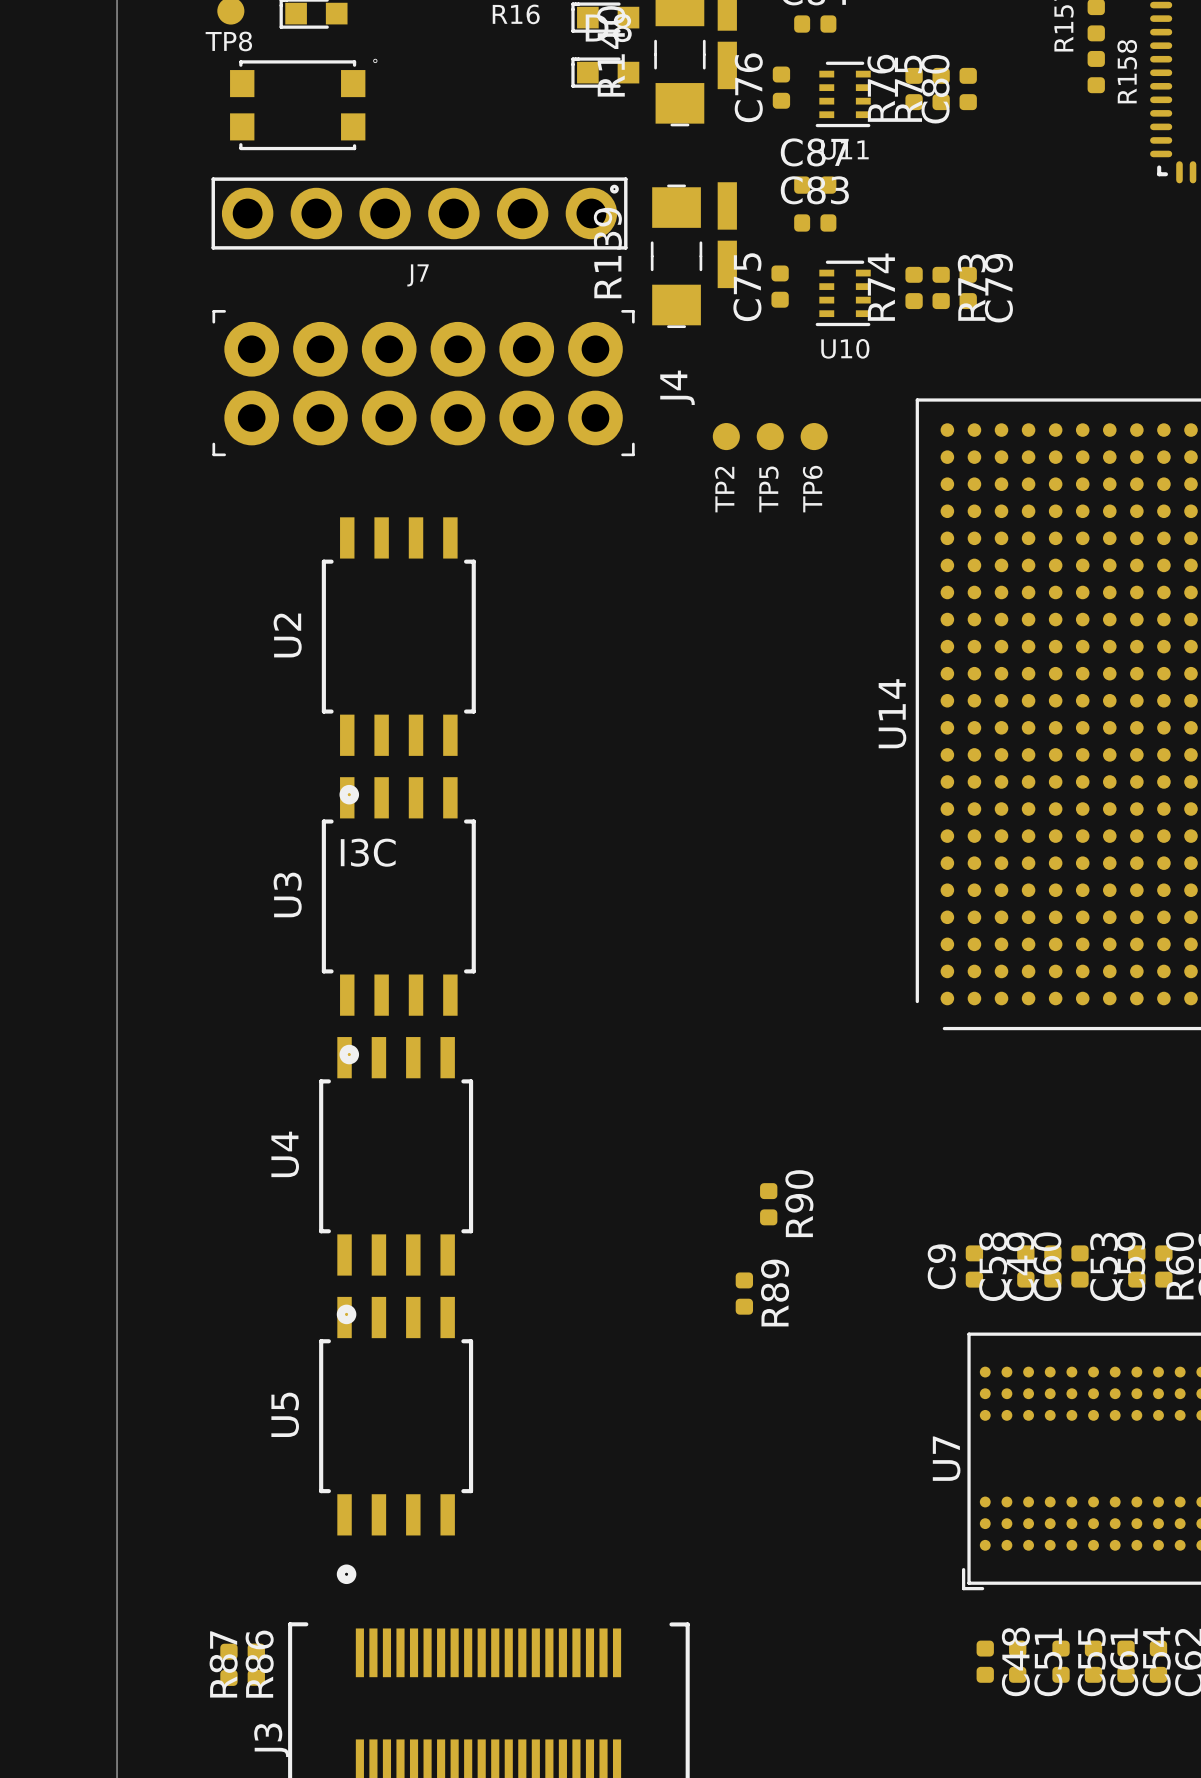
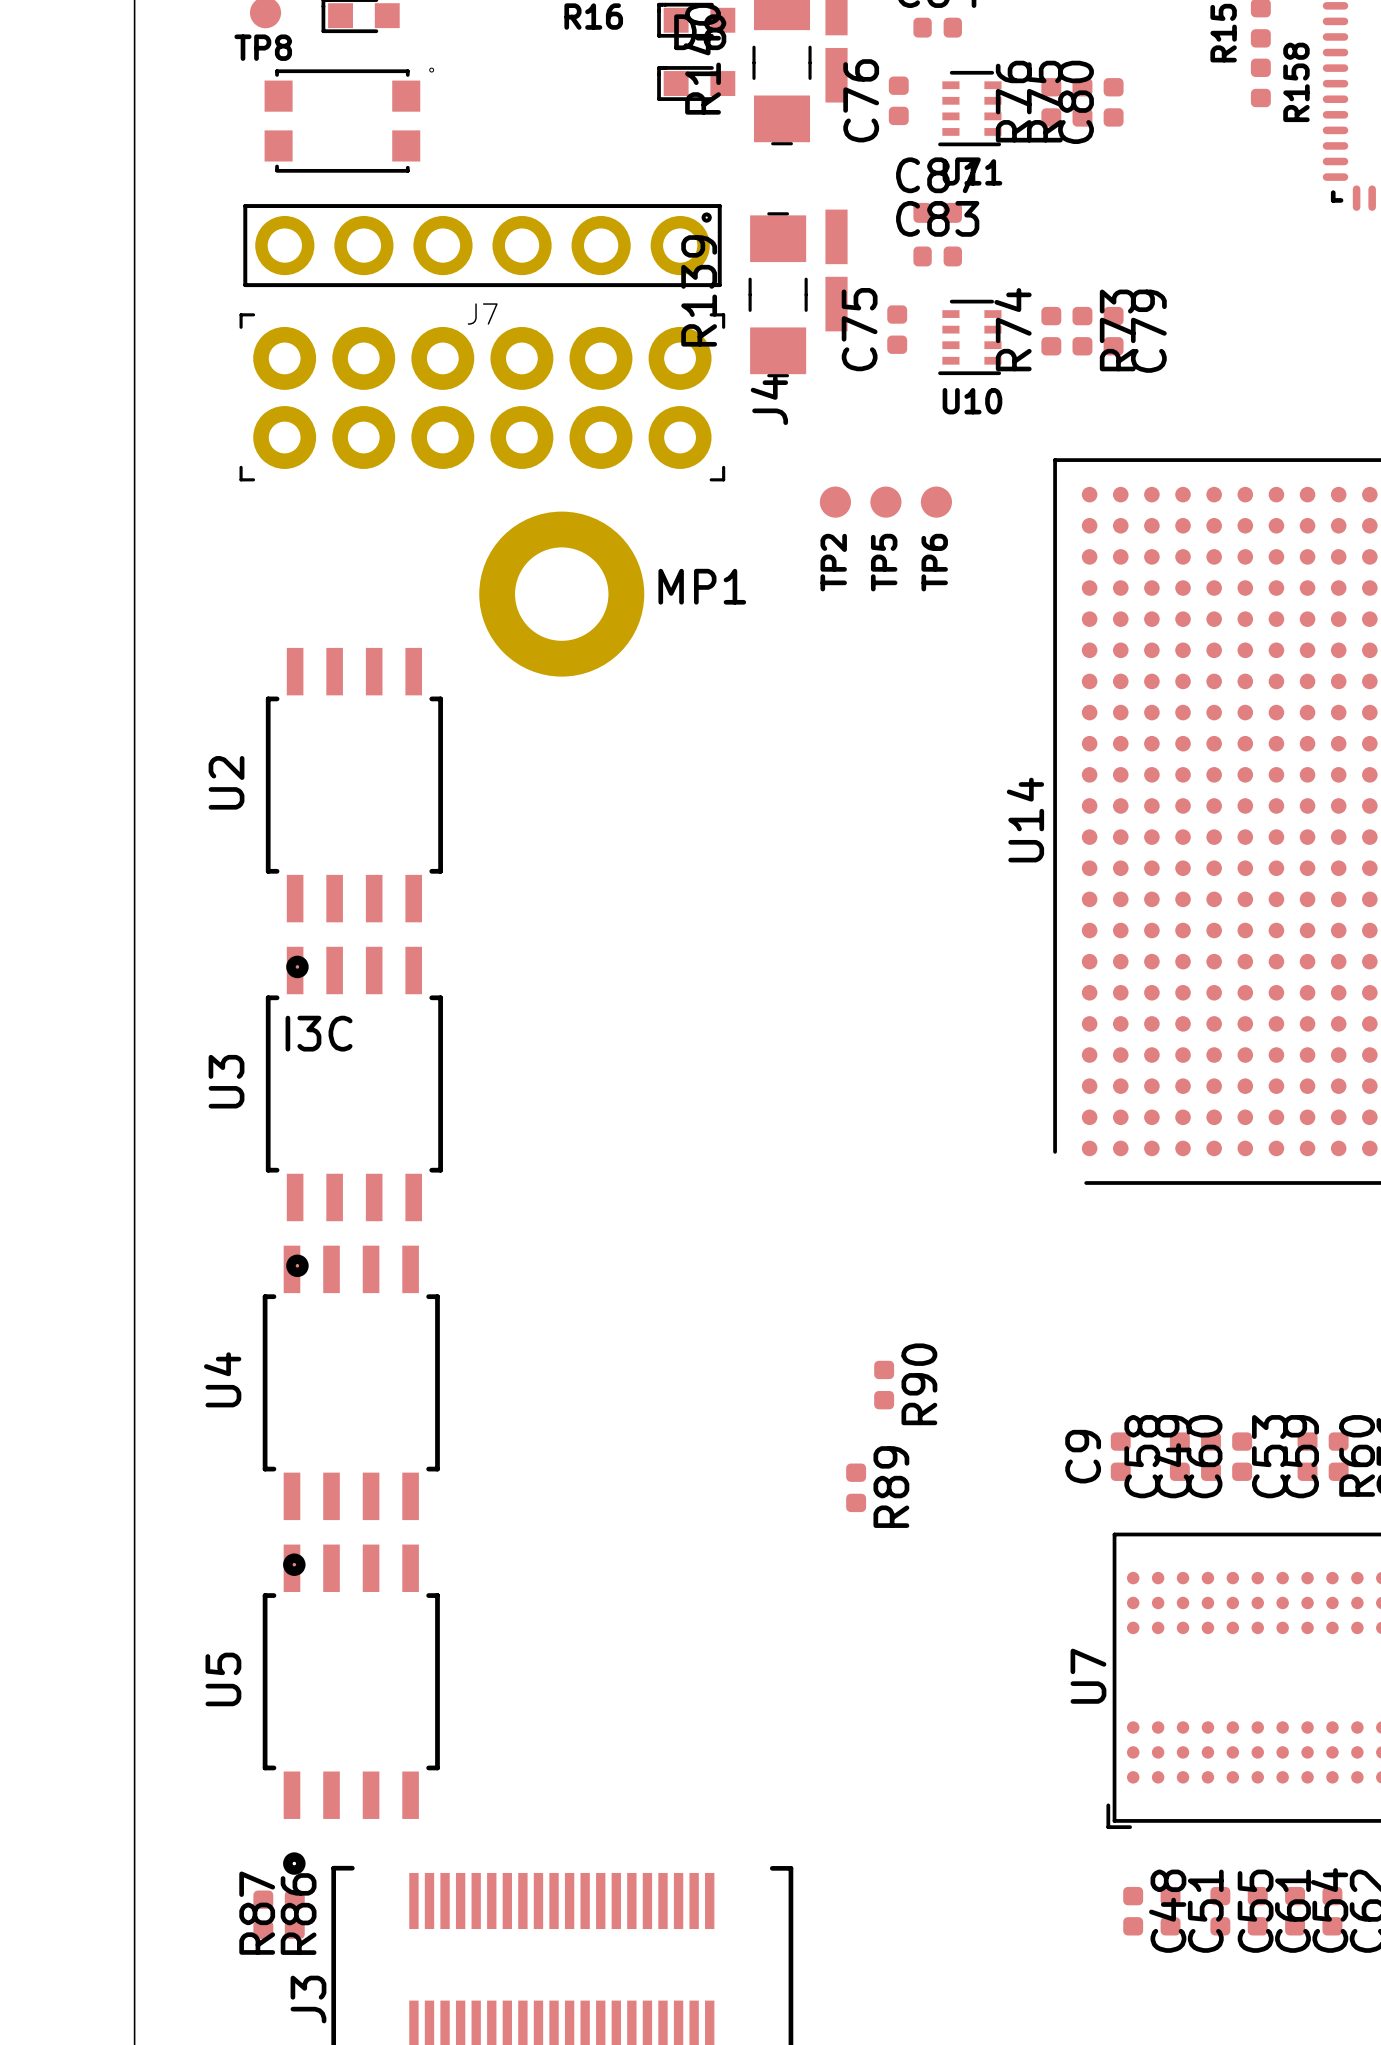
J4 position: (423, 383) -> (482, 397)
MP1: none -> (561, 594)
U2 position: (398, 660) -> (354, 813)
text position: I3C (368, 852) -> I3C (319, 1033)
U3 position: (398, 920) -> (354, 1111)
U4 position: (396, 1180) -> (351, 1410)
U5 position: (396, 1440) -> (351, 1709)

